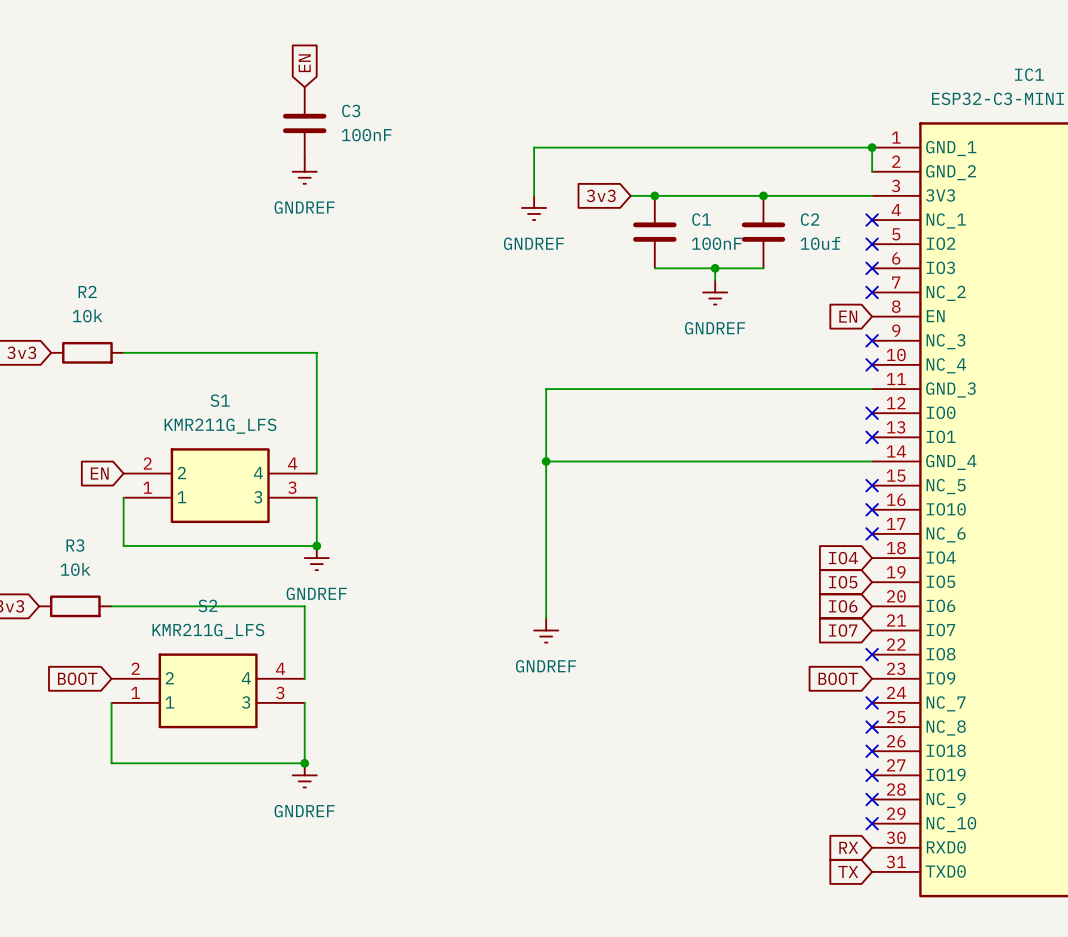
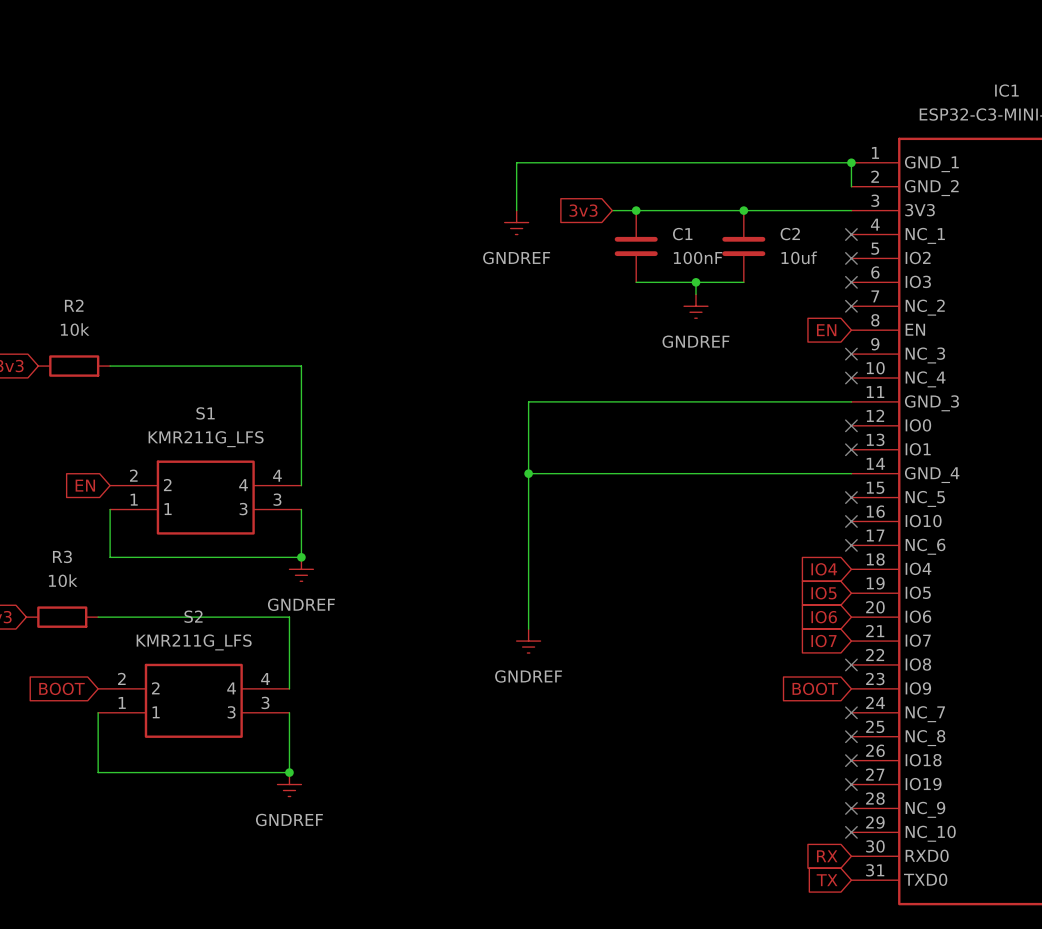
global label: EN (304, 63) -> none
C3: 100nF (304, 123) -> none
power symbol: GNDREF (304, 171) -> none

